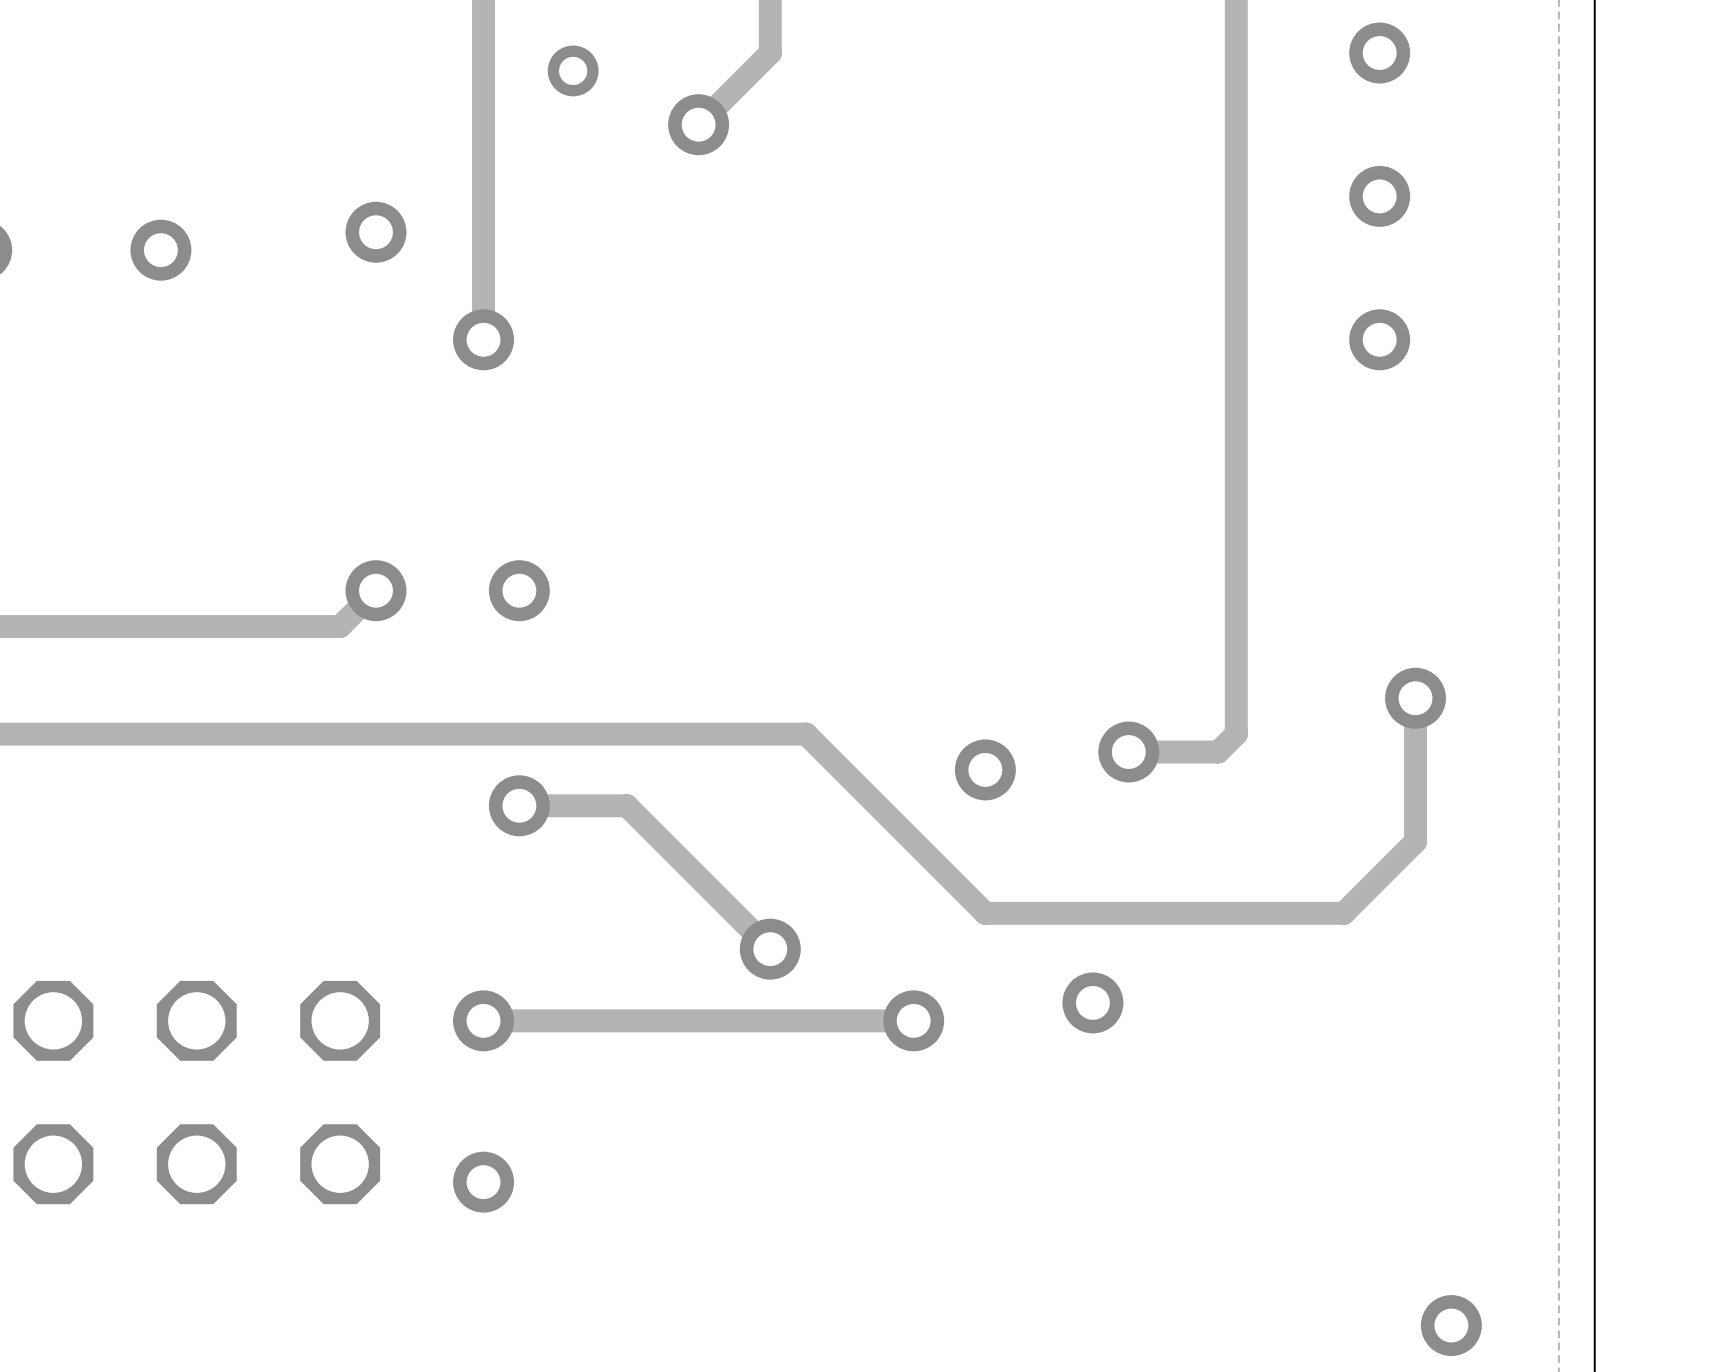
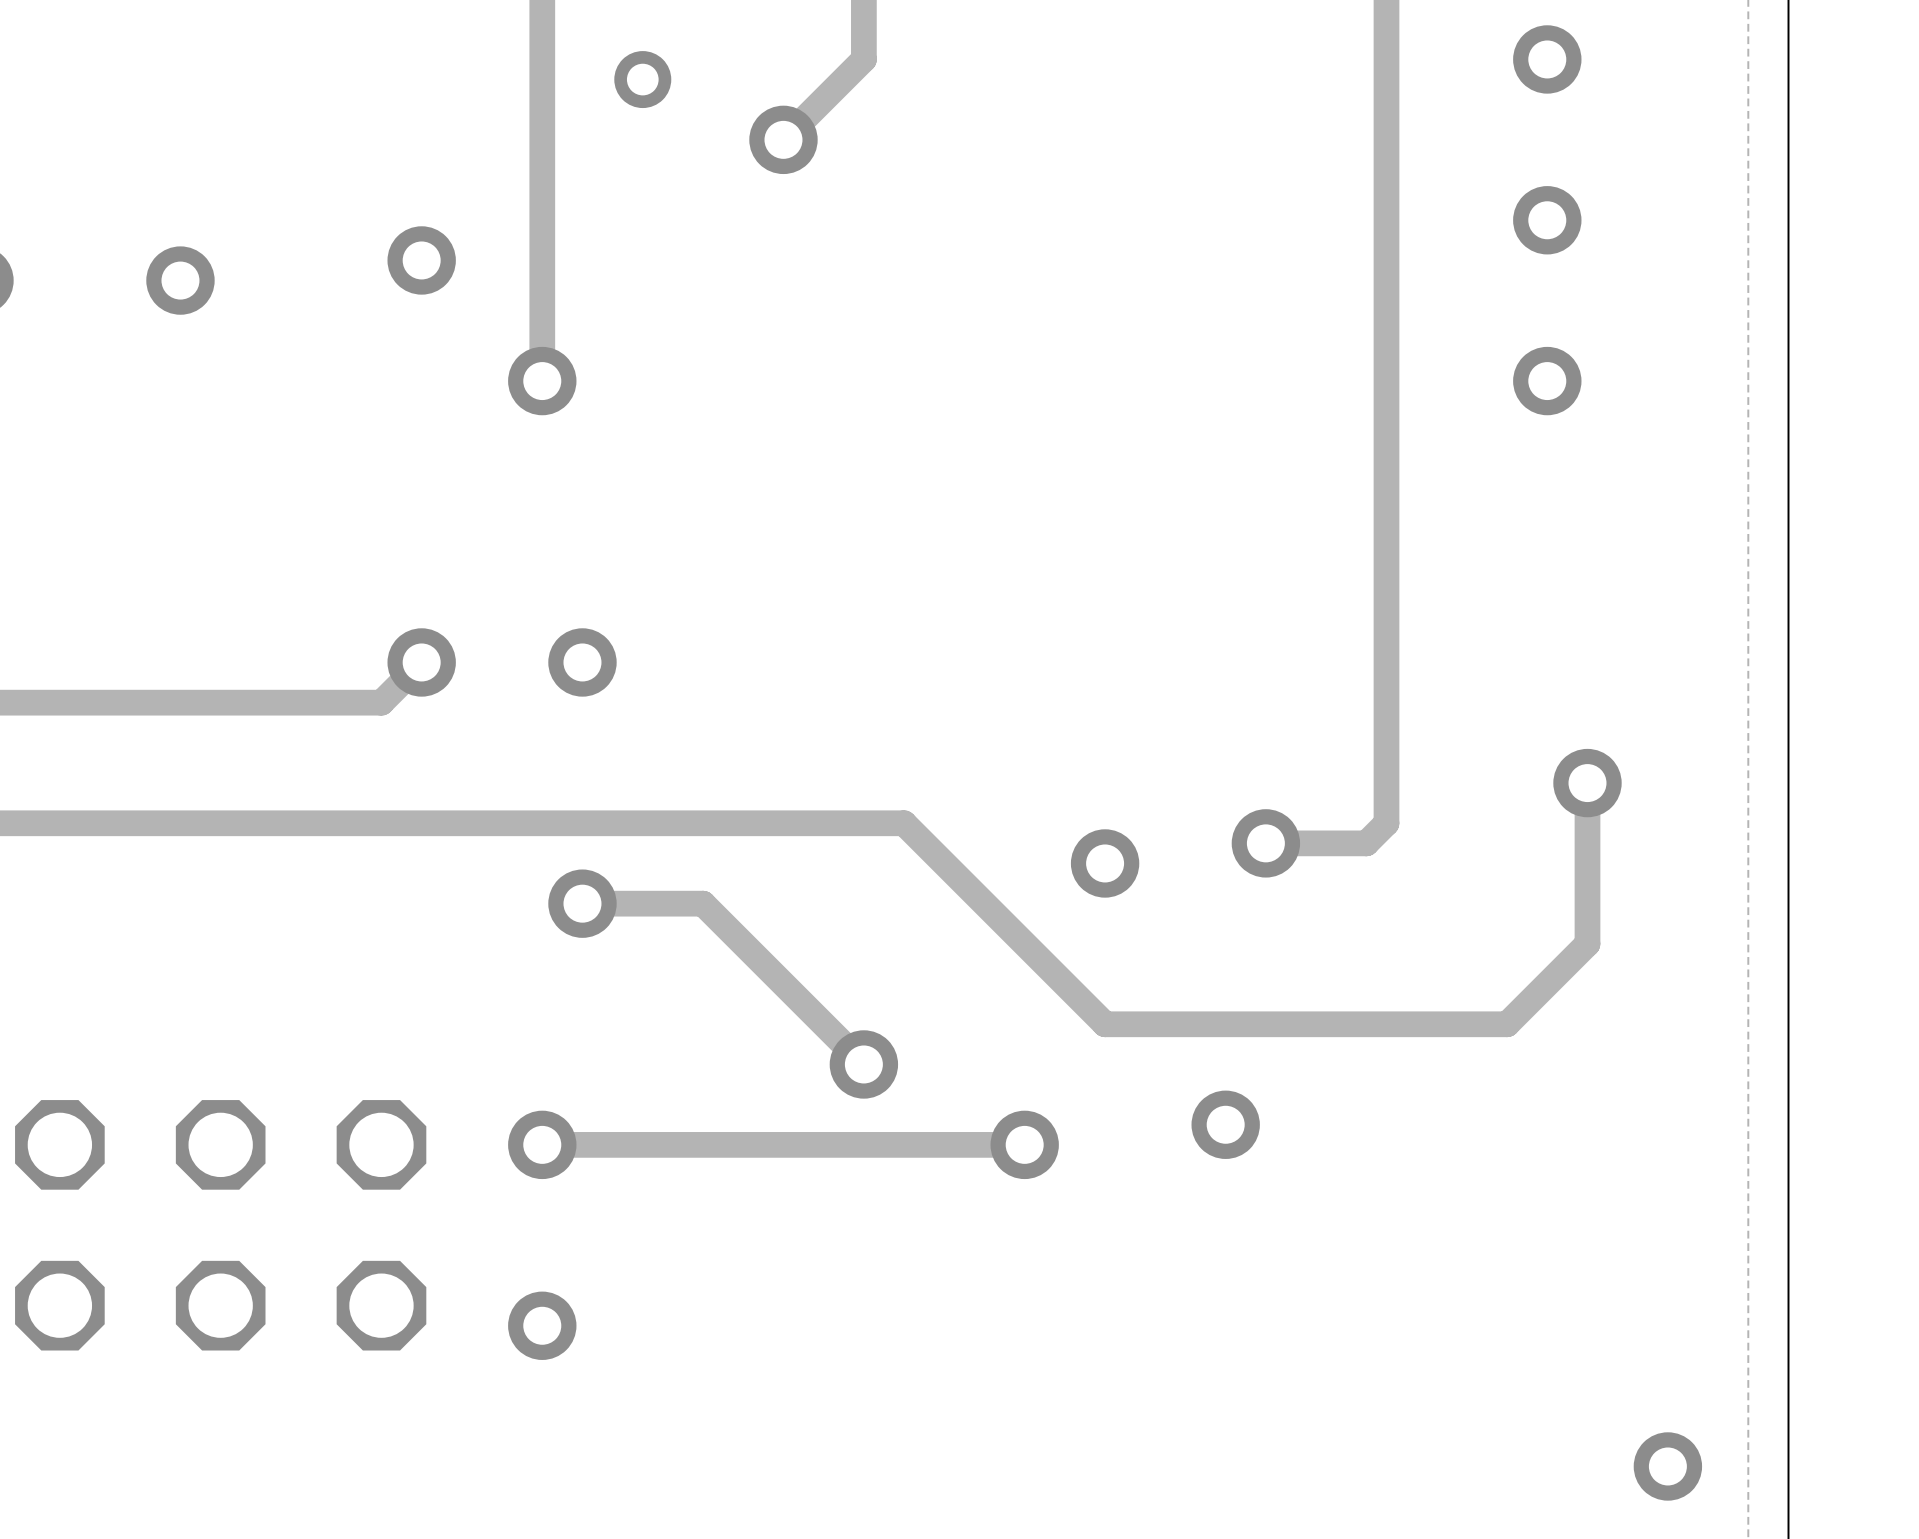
via position: (1451, 1325) -> (1667, 1466)

